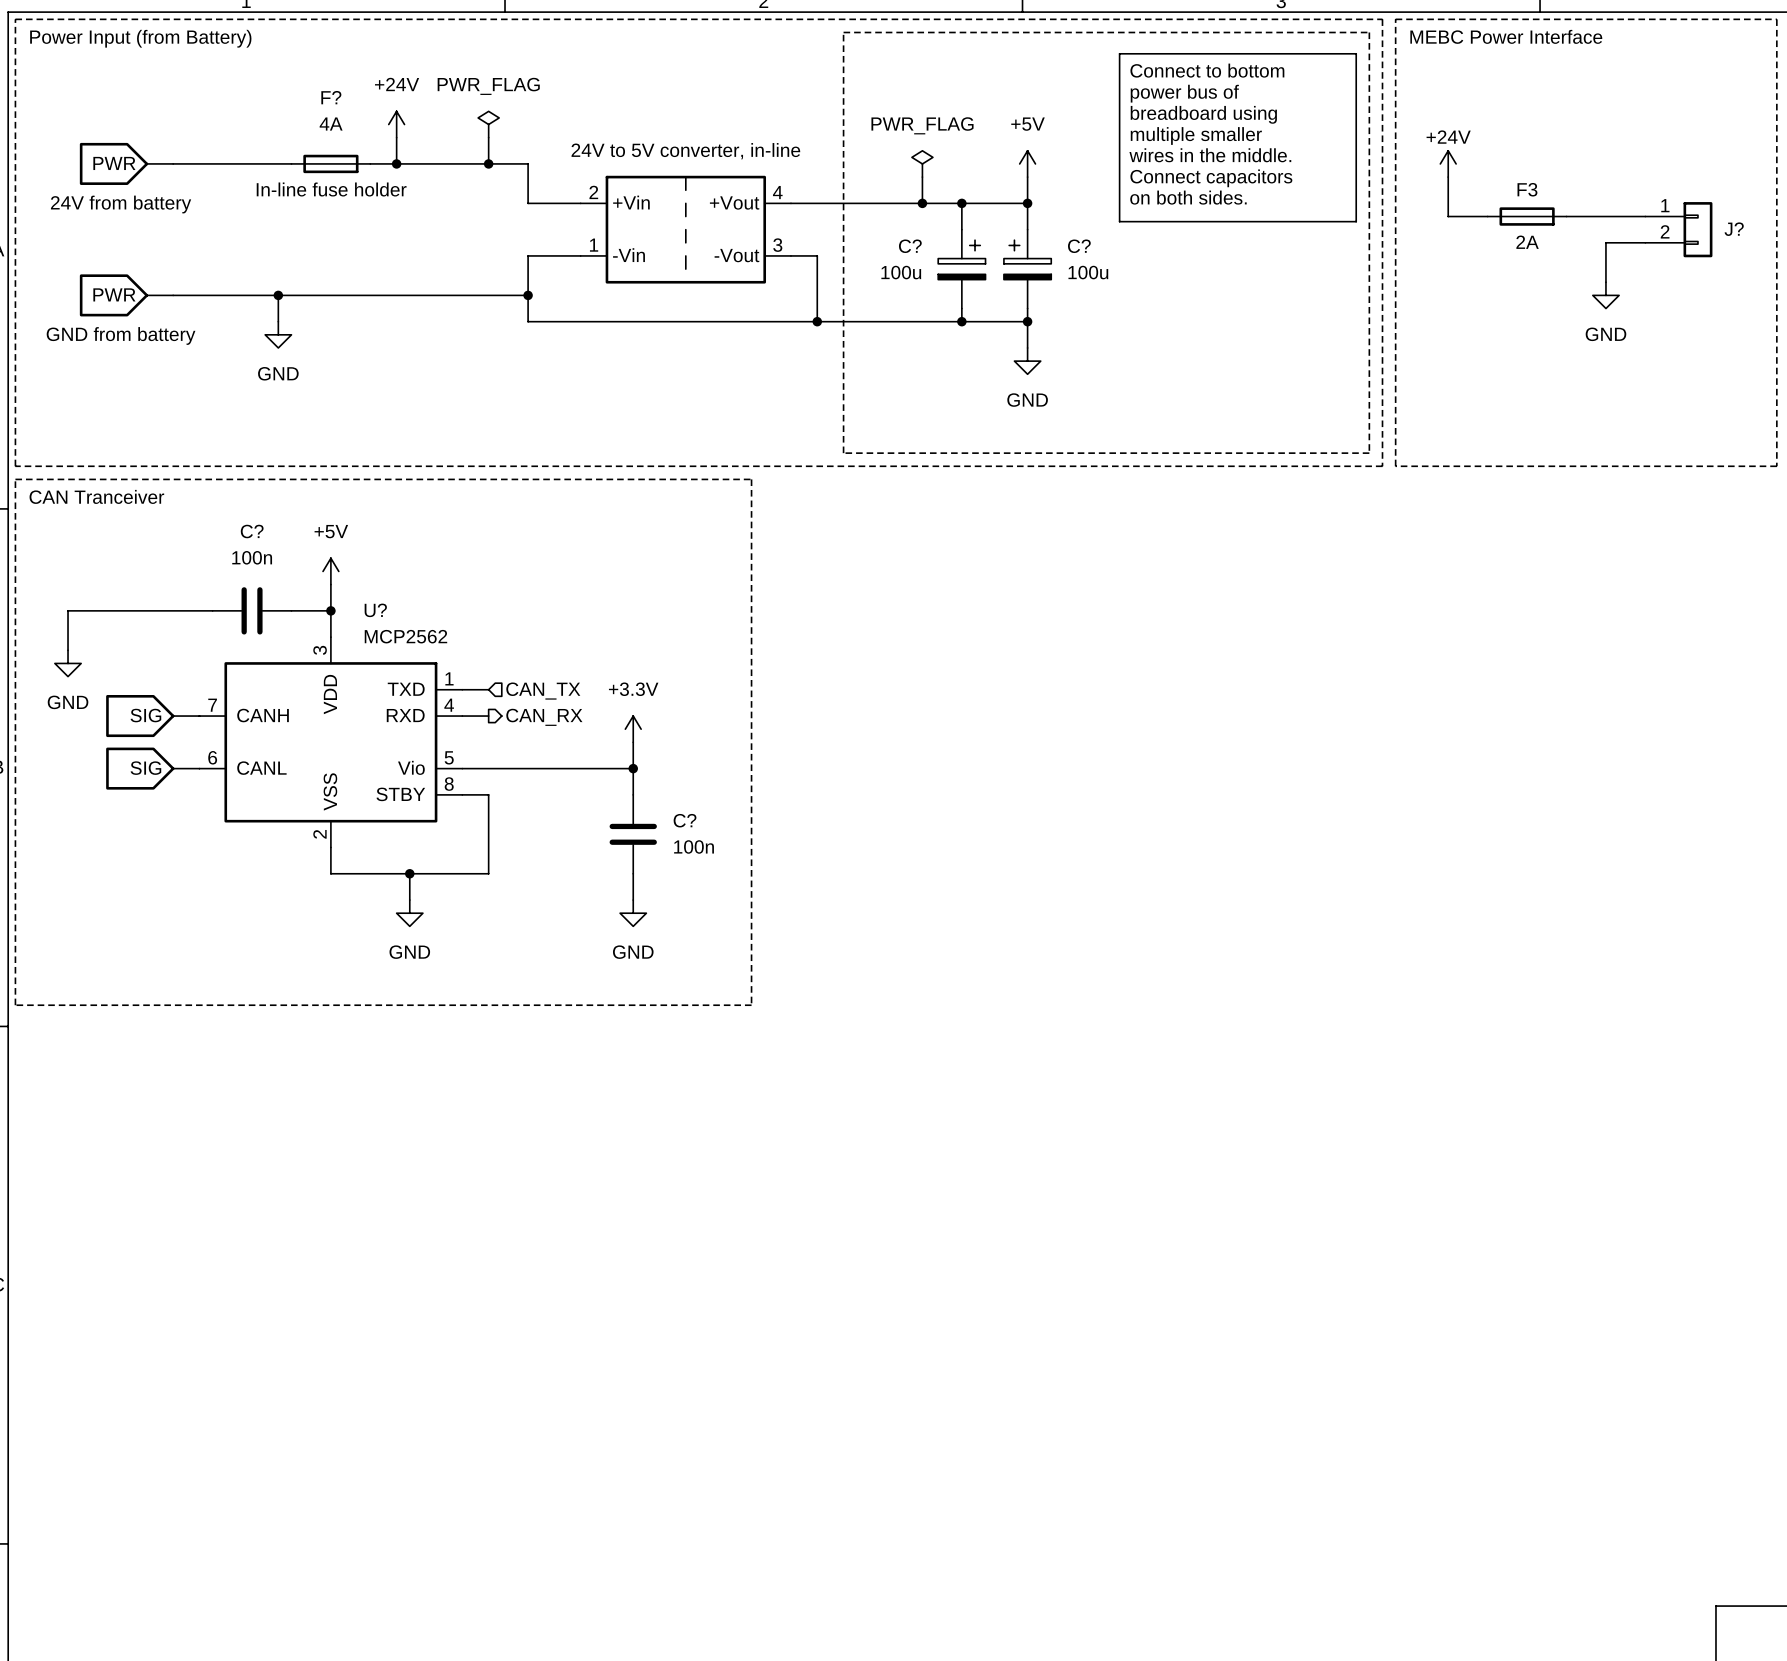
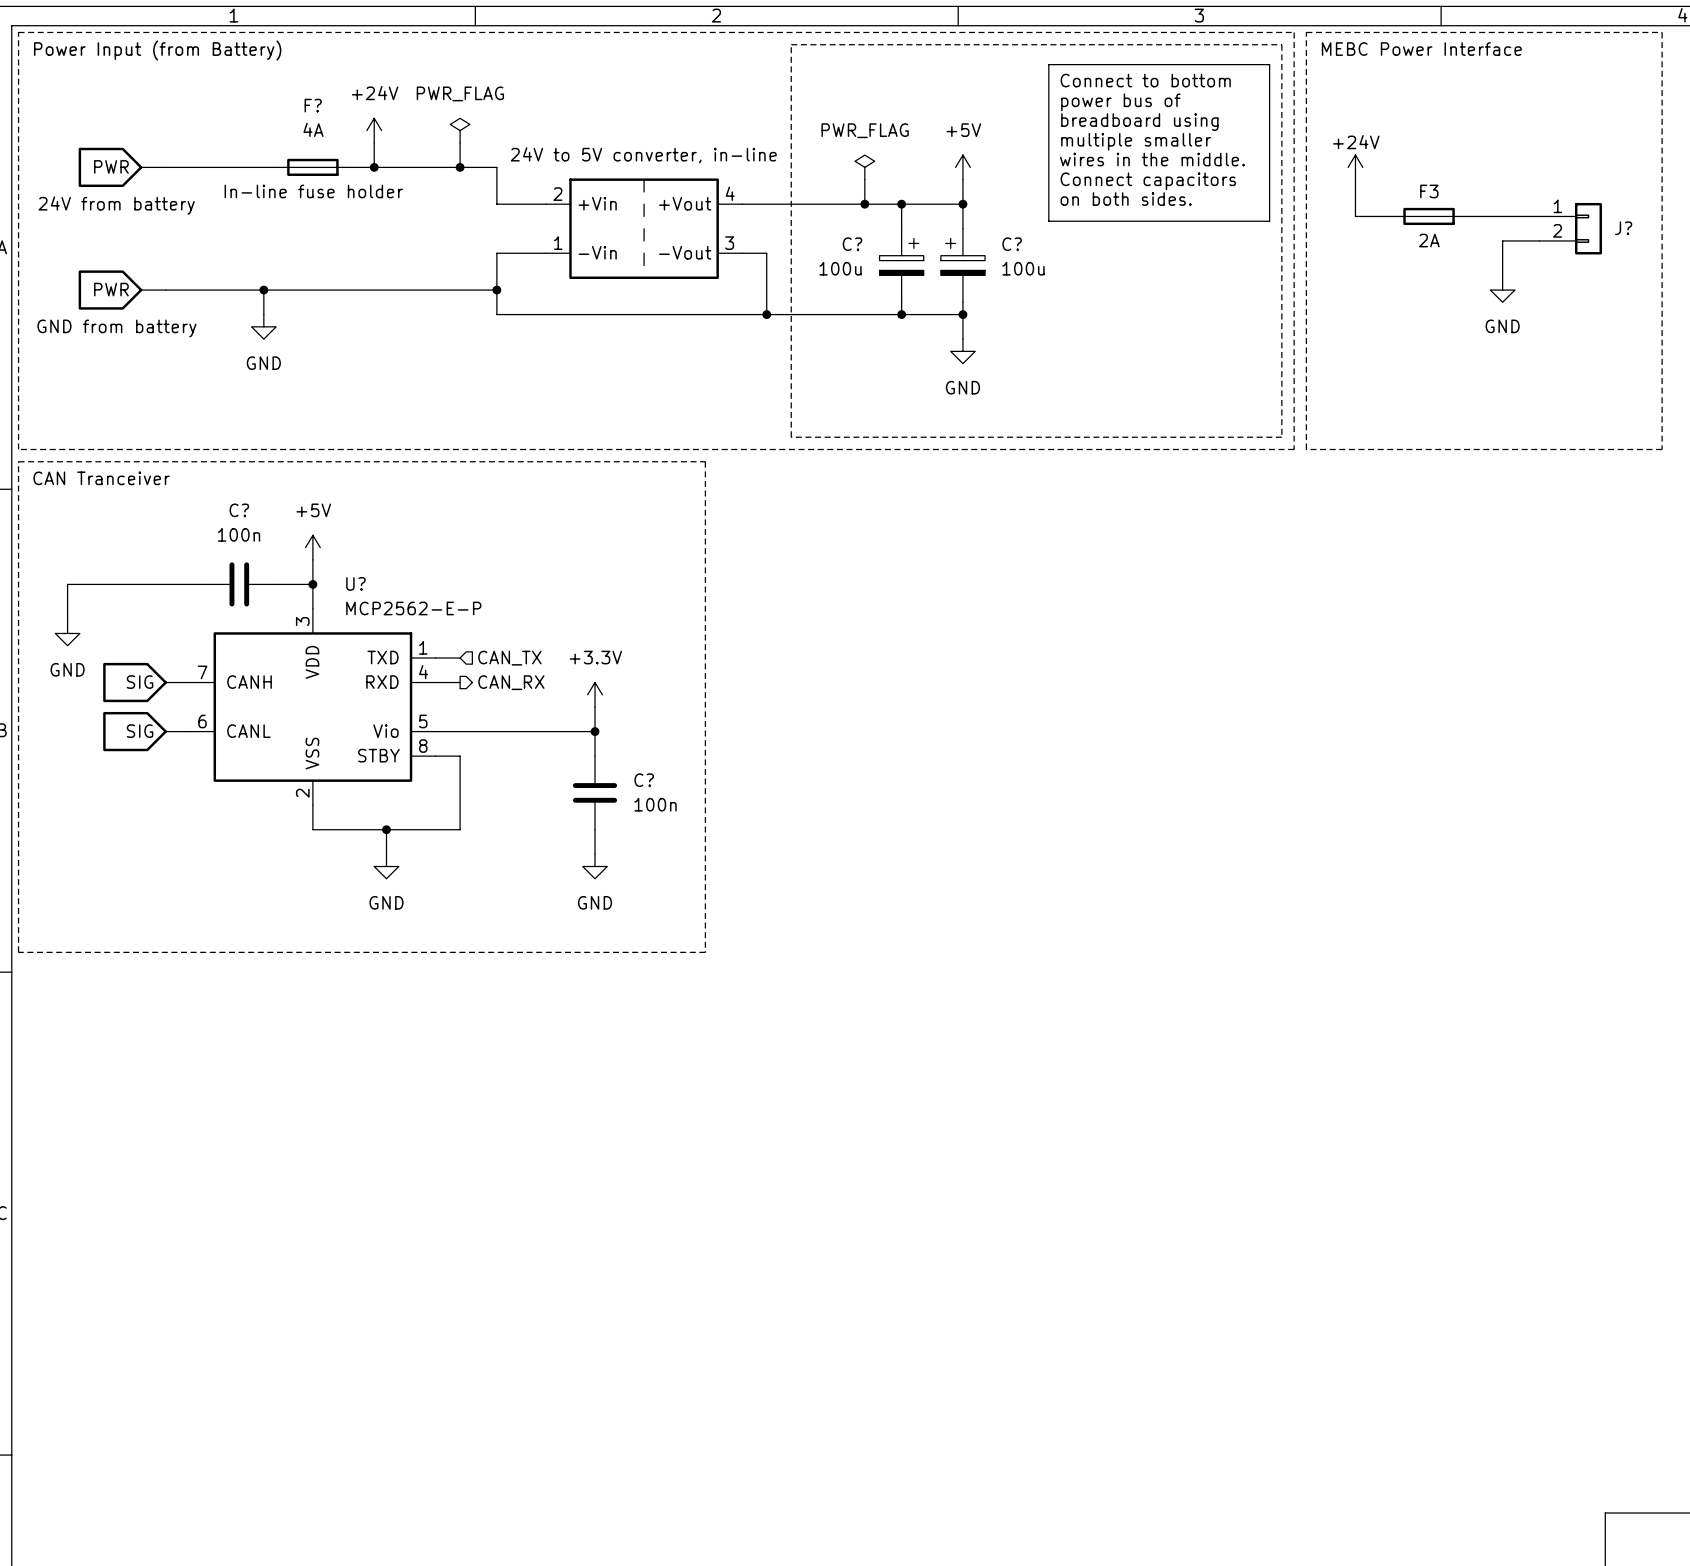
U? value: MCP2562 (405, 636) -> MCP2562-E-P (413, 608)

